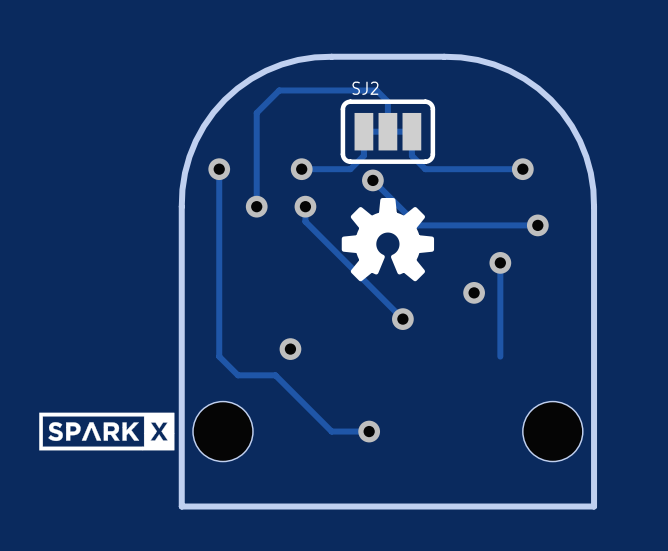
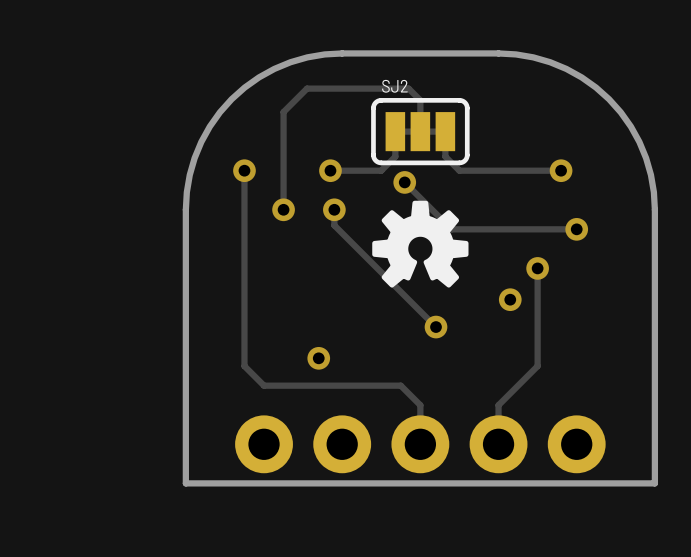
board edge: (444, 56) (477, 59) (494, 64) (509, 70) (538, 88) (562, 112) (580, 141) (586, 156) (590, 173) (594, 206) (594, 506) (181, 506) (181, 206) (185, 173) (189, 156) (195, 141) (213, 112) (237, 88) (266, 70) (281, 64) (298, 59) (331, 56) -> (479, 53) (516, 54) (533, 57) (550, 62) (581, 77) (609, 99) (620, 112) (630, 126) (646, 158) (653, 192) (654, 209) (654, 483) (185, 483) (185, 209) (186, 192) (194, 158) (209, 126) (219, 112) (231, 99) (259, 77) (290, 62) (307, 57) (324, 54) (361, 53)
track: none -> (537, 366) (498, 405) (498, 444)
track: (275, 375) (331, 431) (369, 431) -> (303, 385) (400, 385) (420, 405) (420, 444)
drawing: [39, 412, 175, 451] -> none
part: (222, 431) -> none
via: (369, 431) -> none
part: none -> (420, 444)
part: (552, 431) -> none

